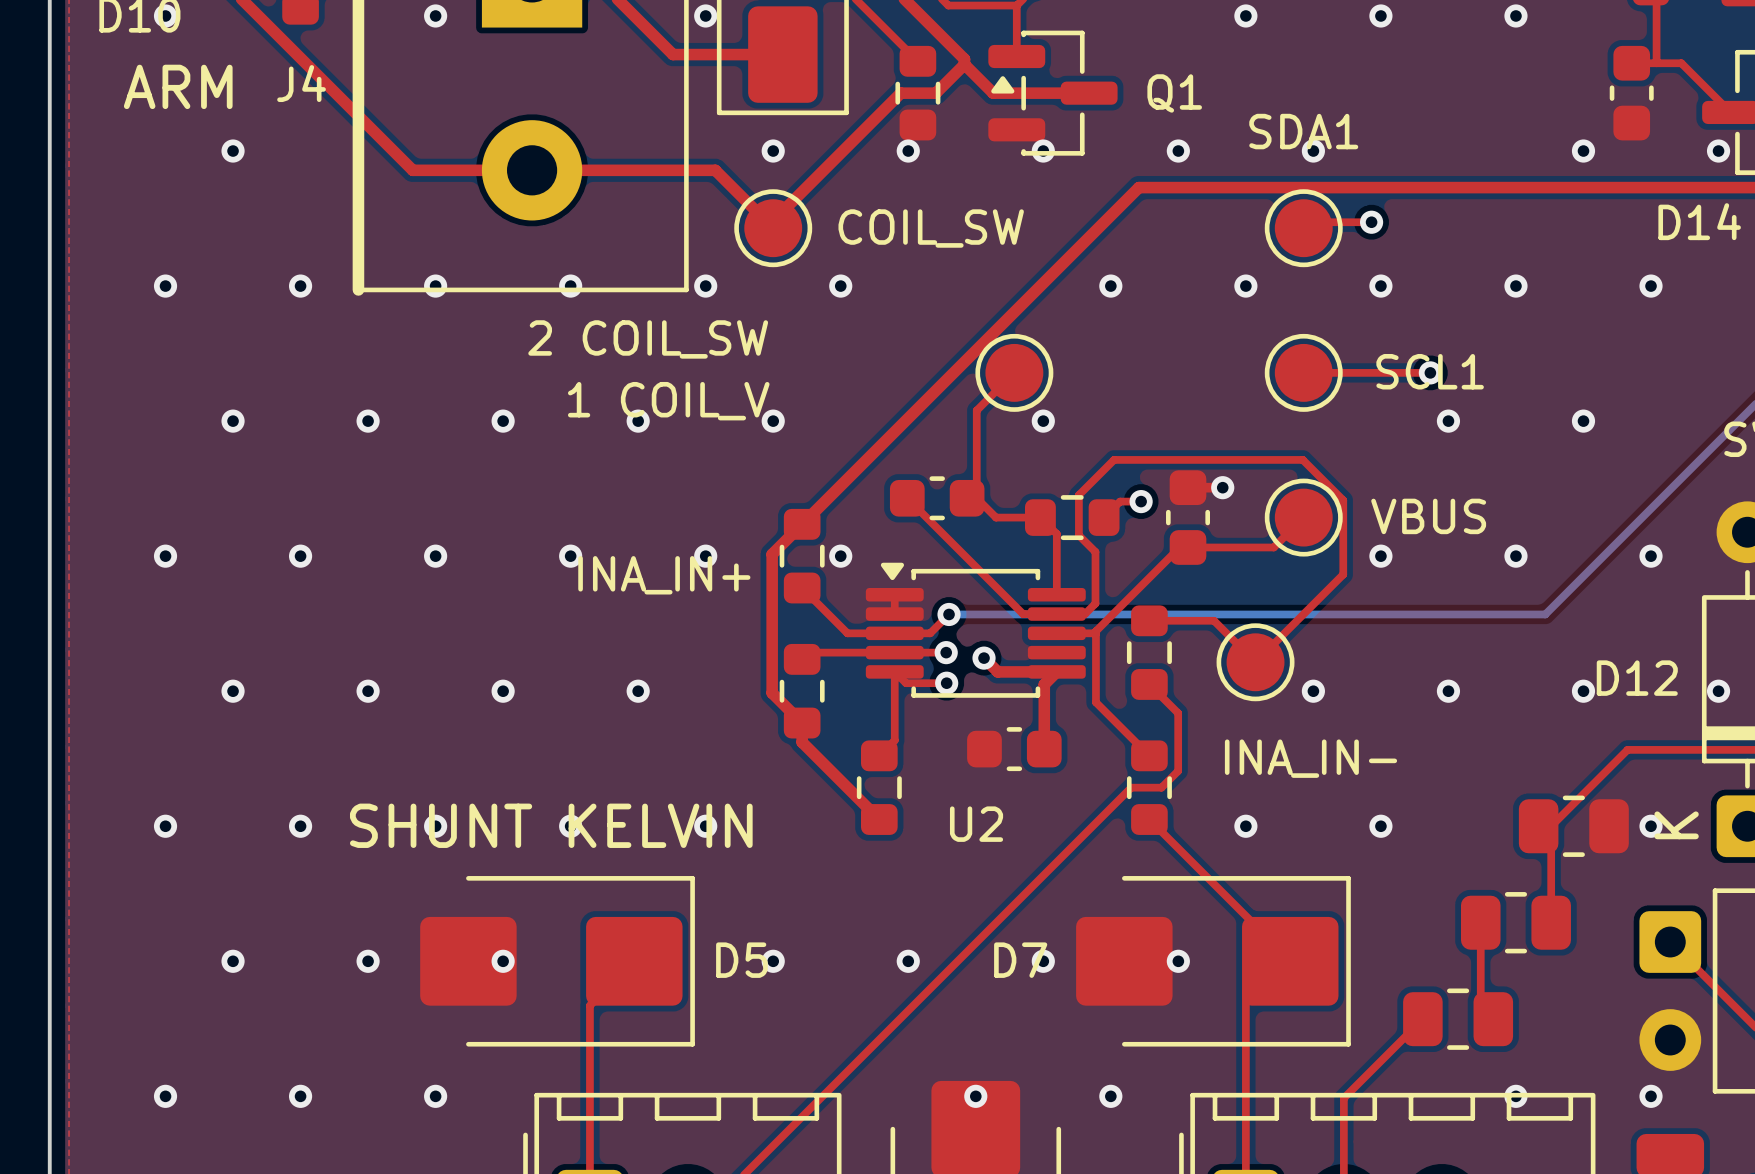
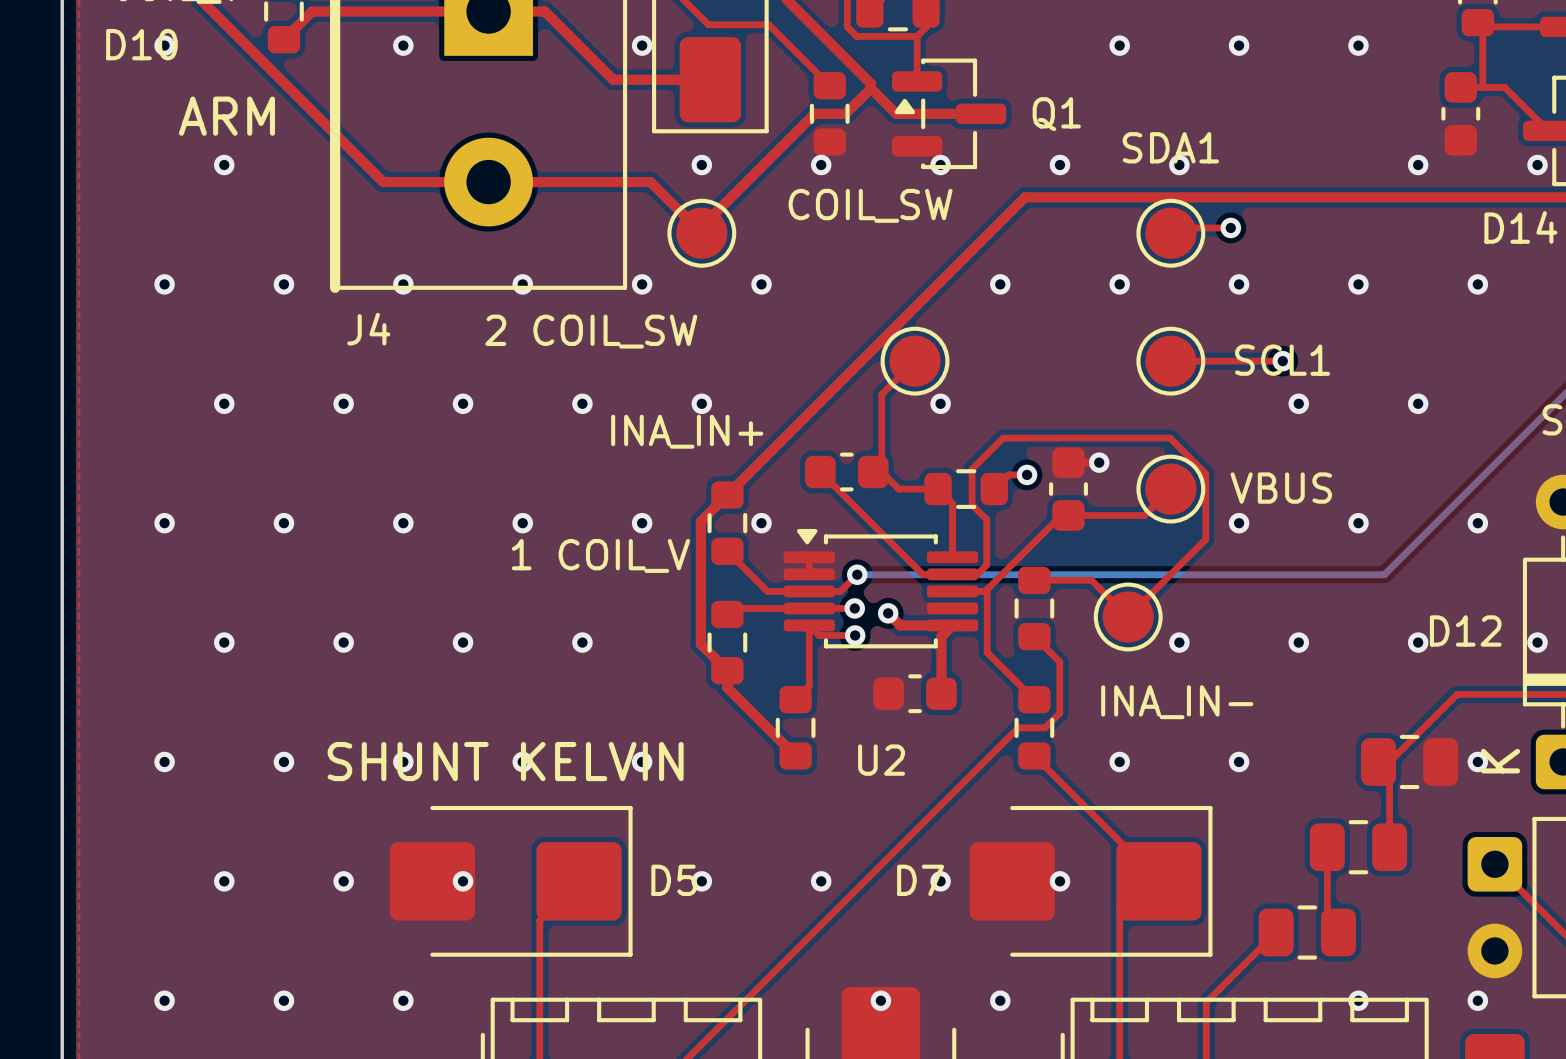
J4 name position: J4 (301, 83) -> J4 (368, 329)
text position: ARM (178, 86) -> ARM (226, 116)
text position: COIL_SW (931, 228) -> COIL_SW (870, 205)
text position: 1 COIL_V (668, 401) -> 1 COIL_V (600, 555)
text position: INA_IN+ (664, 575) -> INA_IN+ (687, 431)

